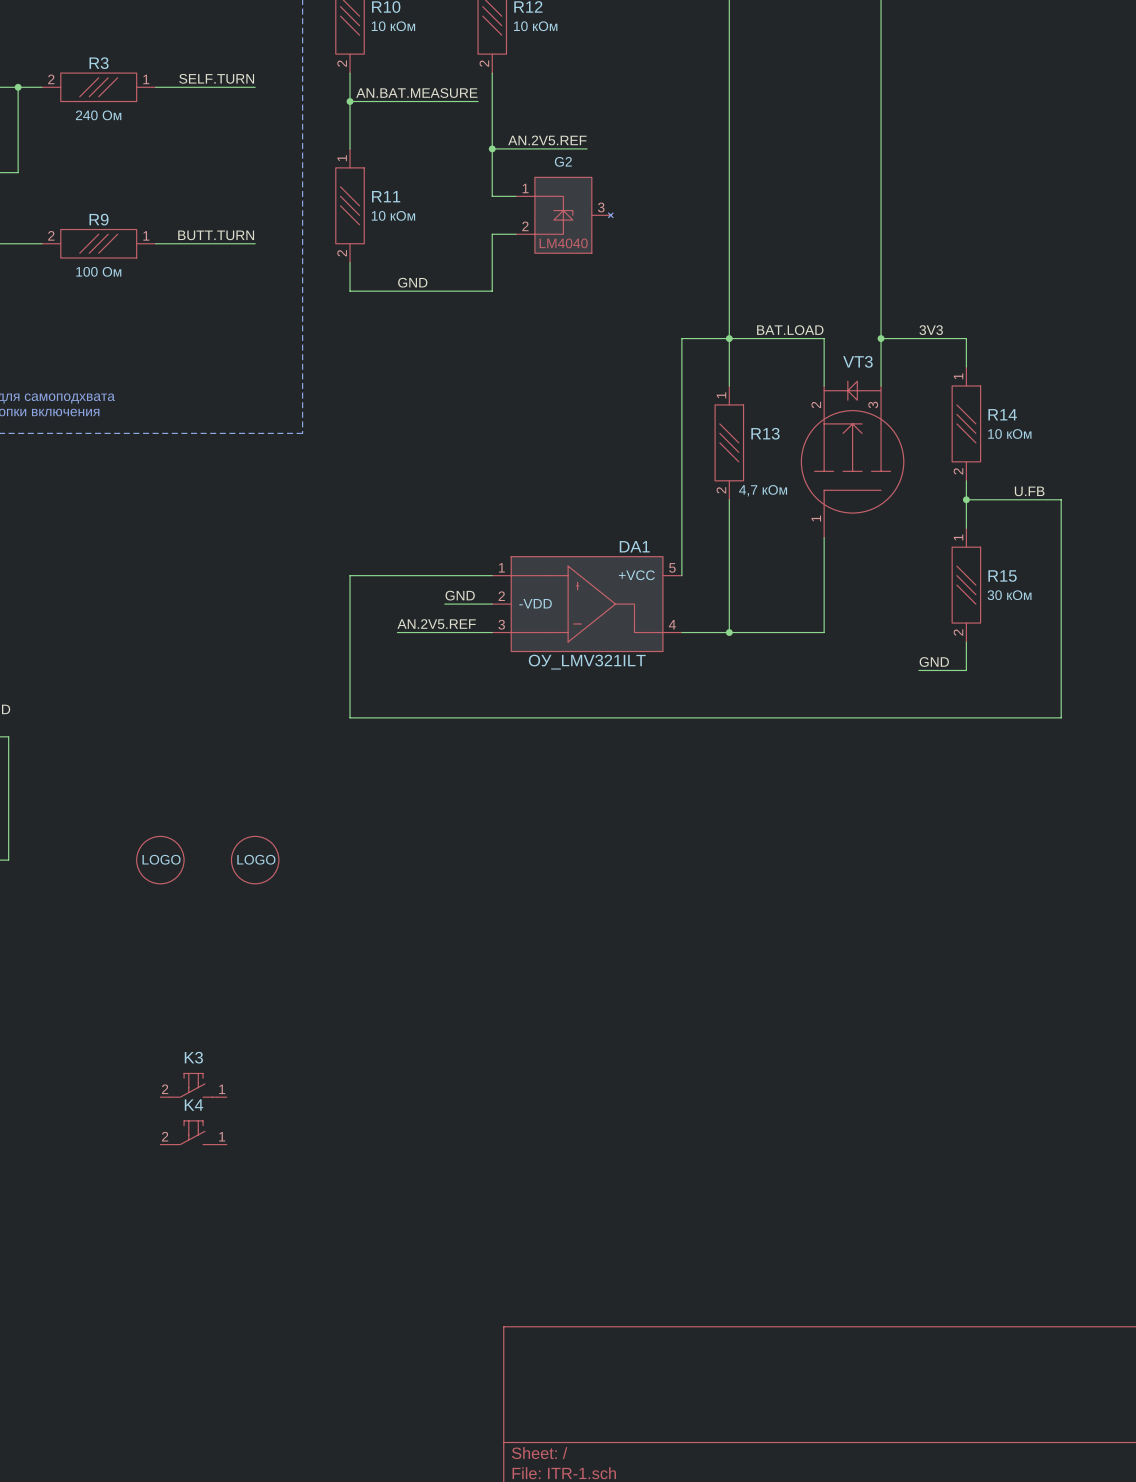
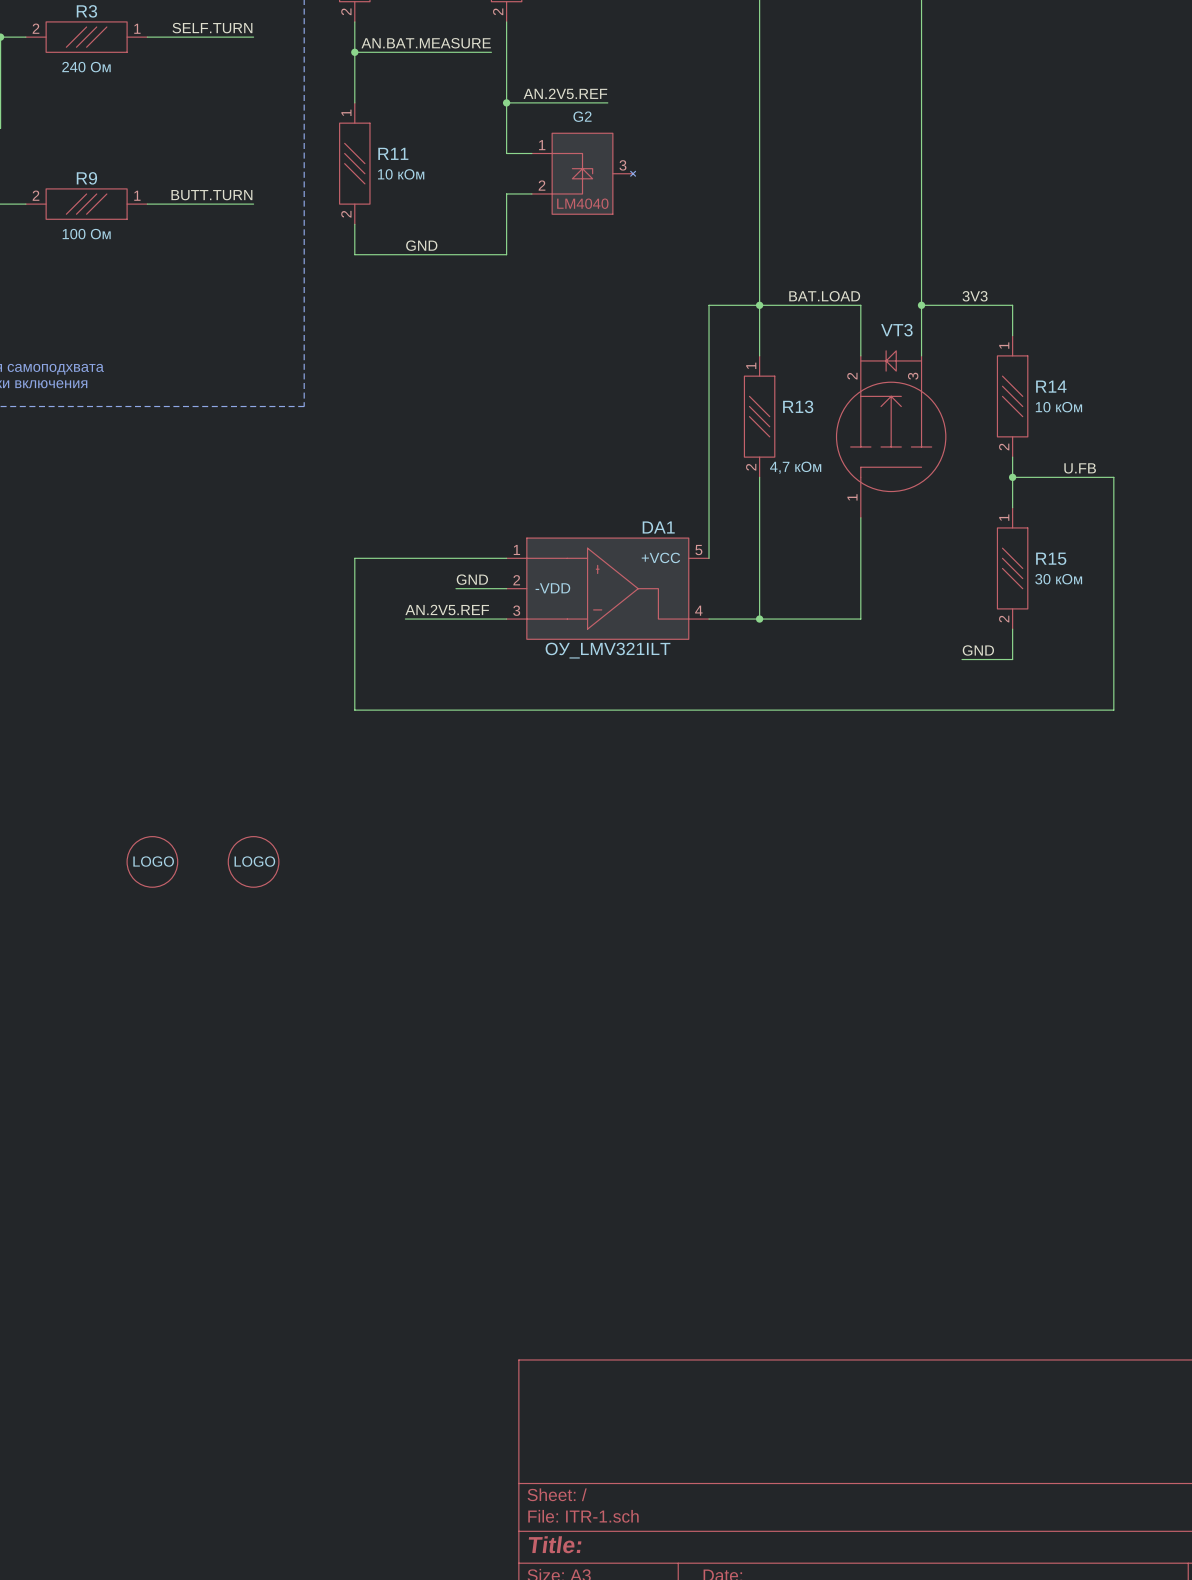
K3: (193, 1085) -> none
K4: (193, 1132) -> none

